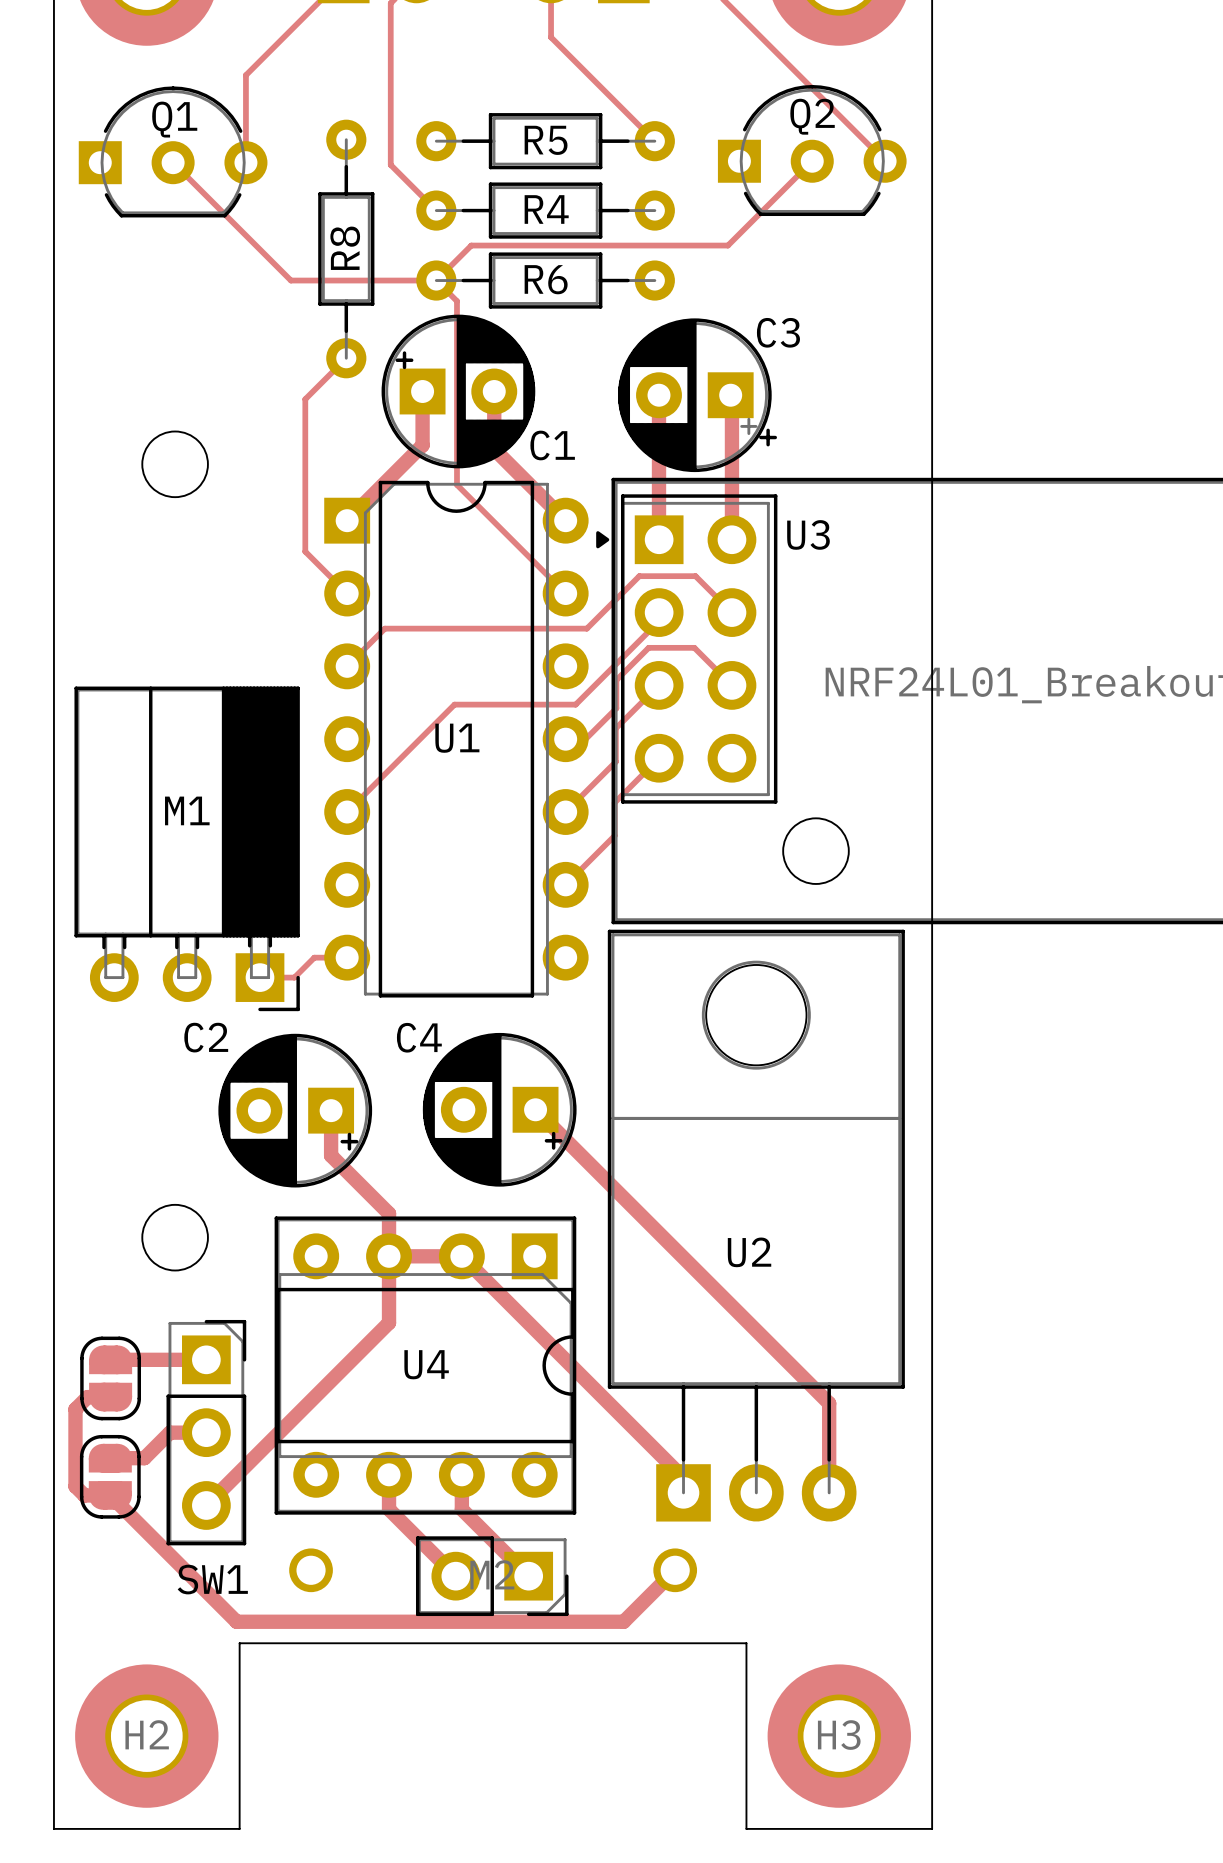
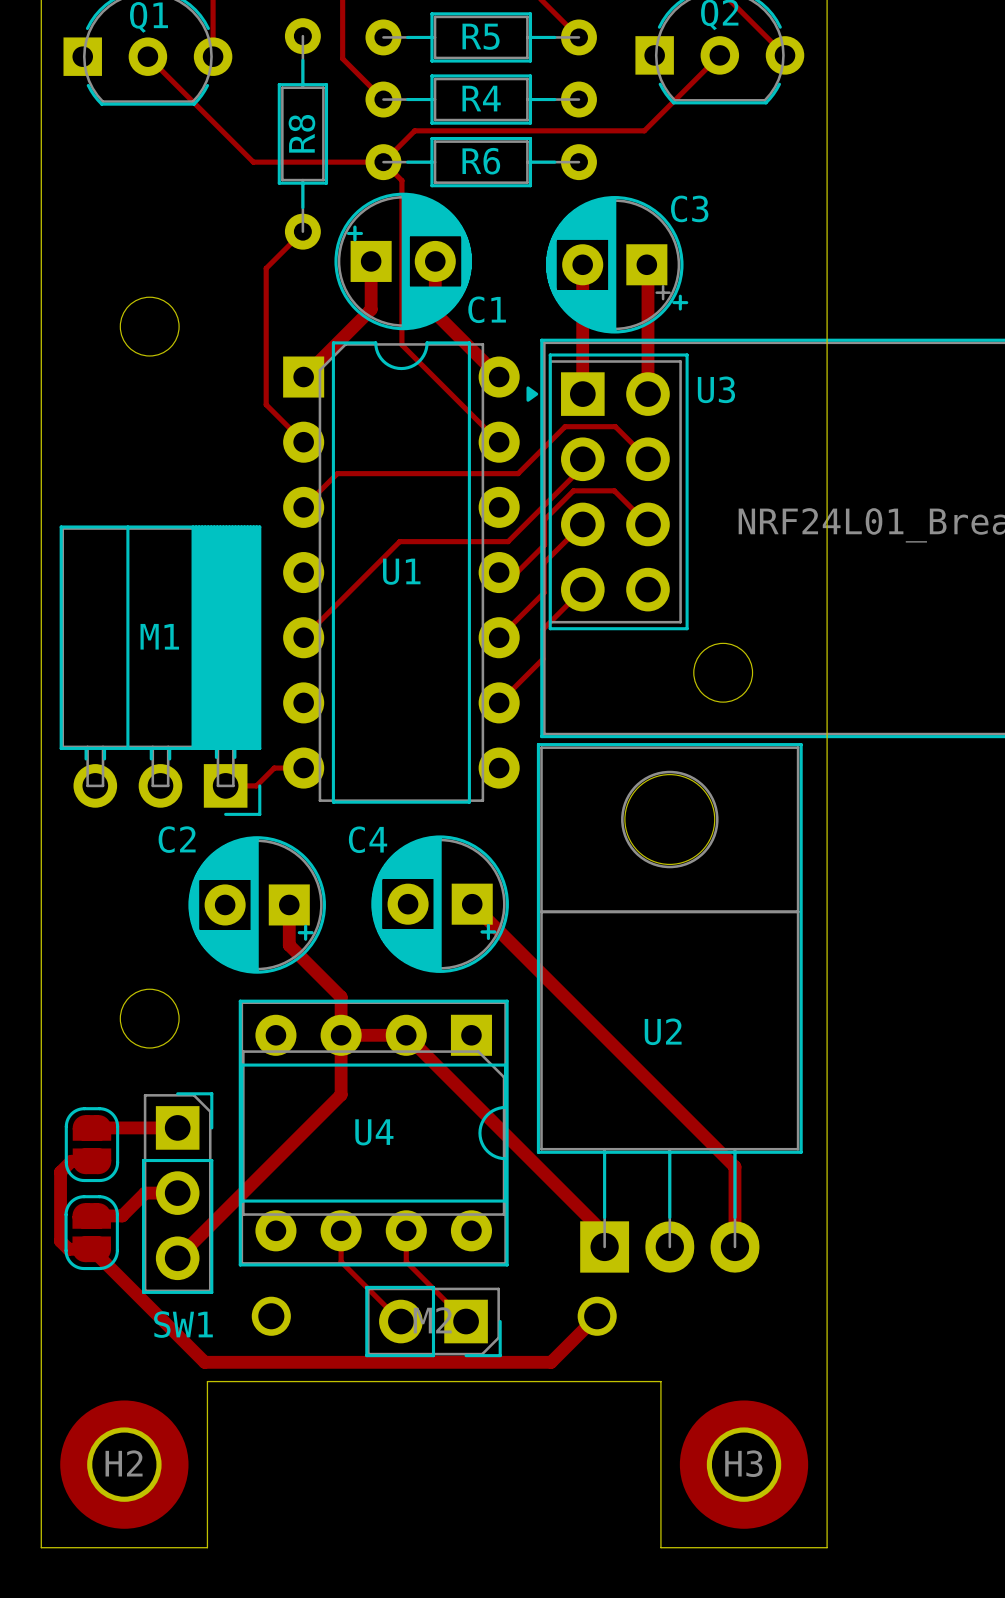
track width: thick (389, 1474) (389, 1509) (455, 1576) -> thin (341, 1230) (341, 1261) (400, 1321)
track width: thick (461, 1474) (461, 1509) (528, 1576) -> thin (406, 1230) (406, 1261) (466, 1321)

